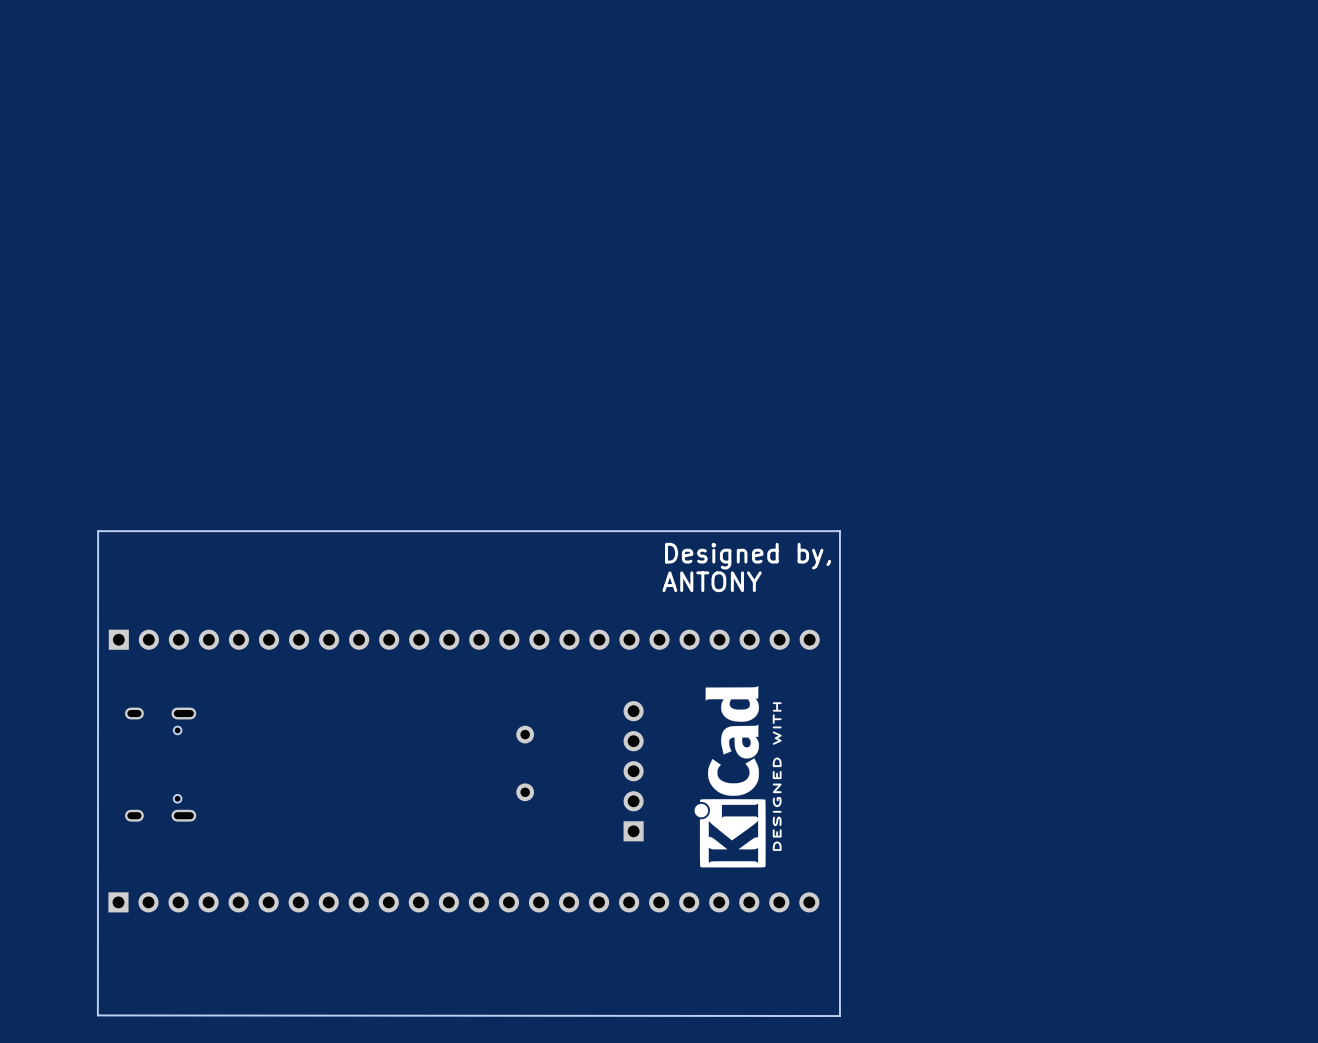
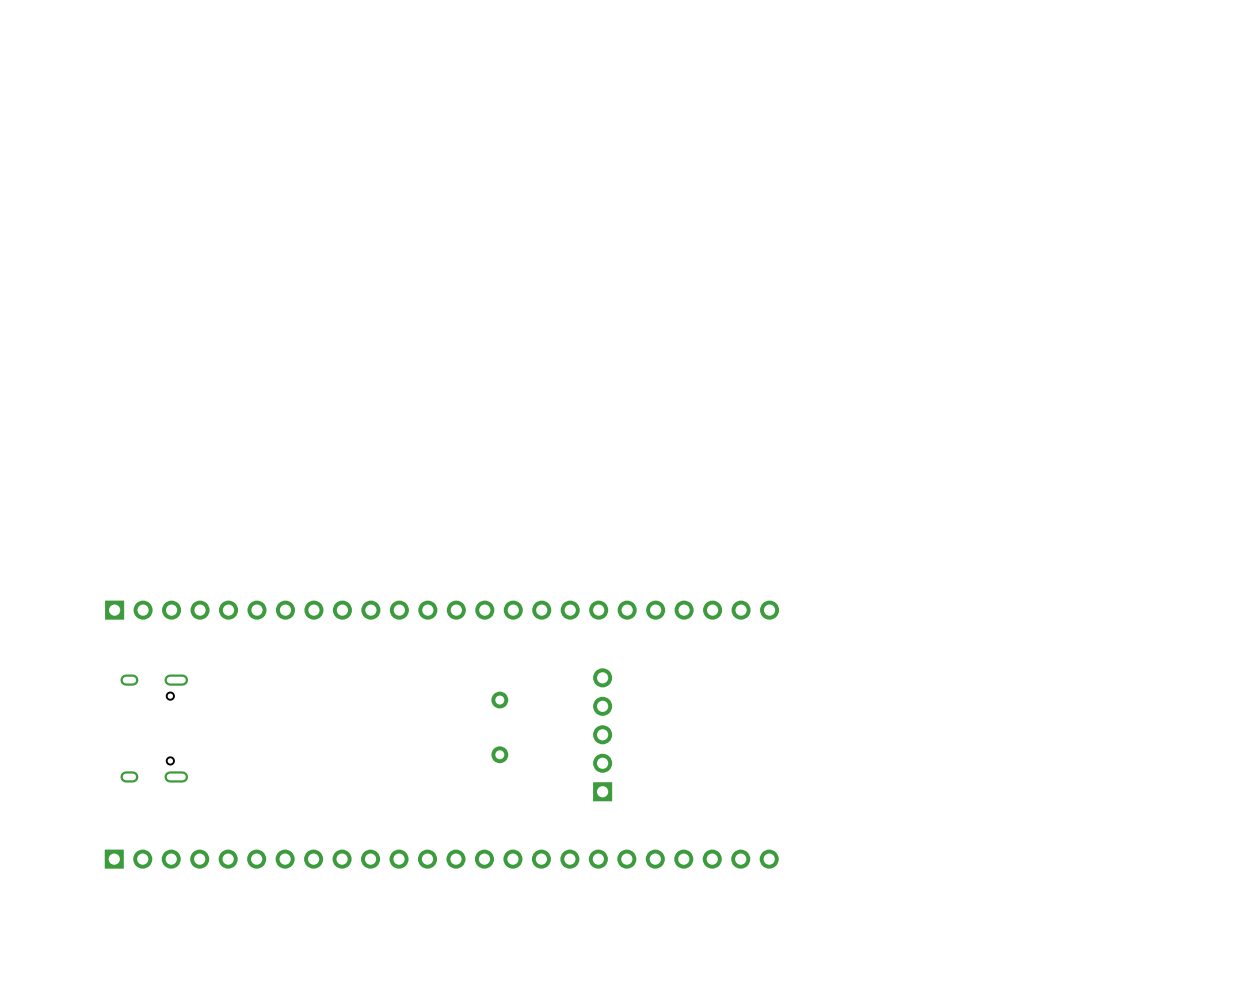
board edge: (839, 531) (839, 1016) (97, 1015) (98, 531) (839, 531) -> none
text: Designed by, (748, 556) -> none
text: ANTONY (712, 581) -> none
drawing: [694, 685, 782, 868] -> none

